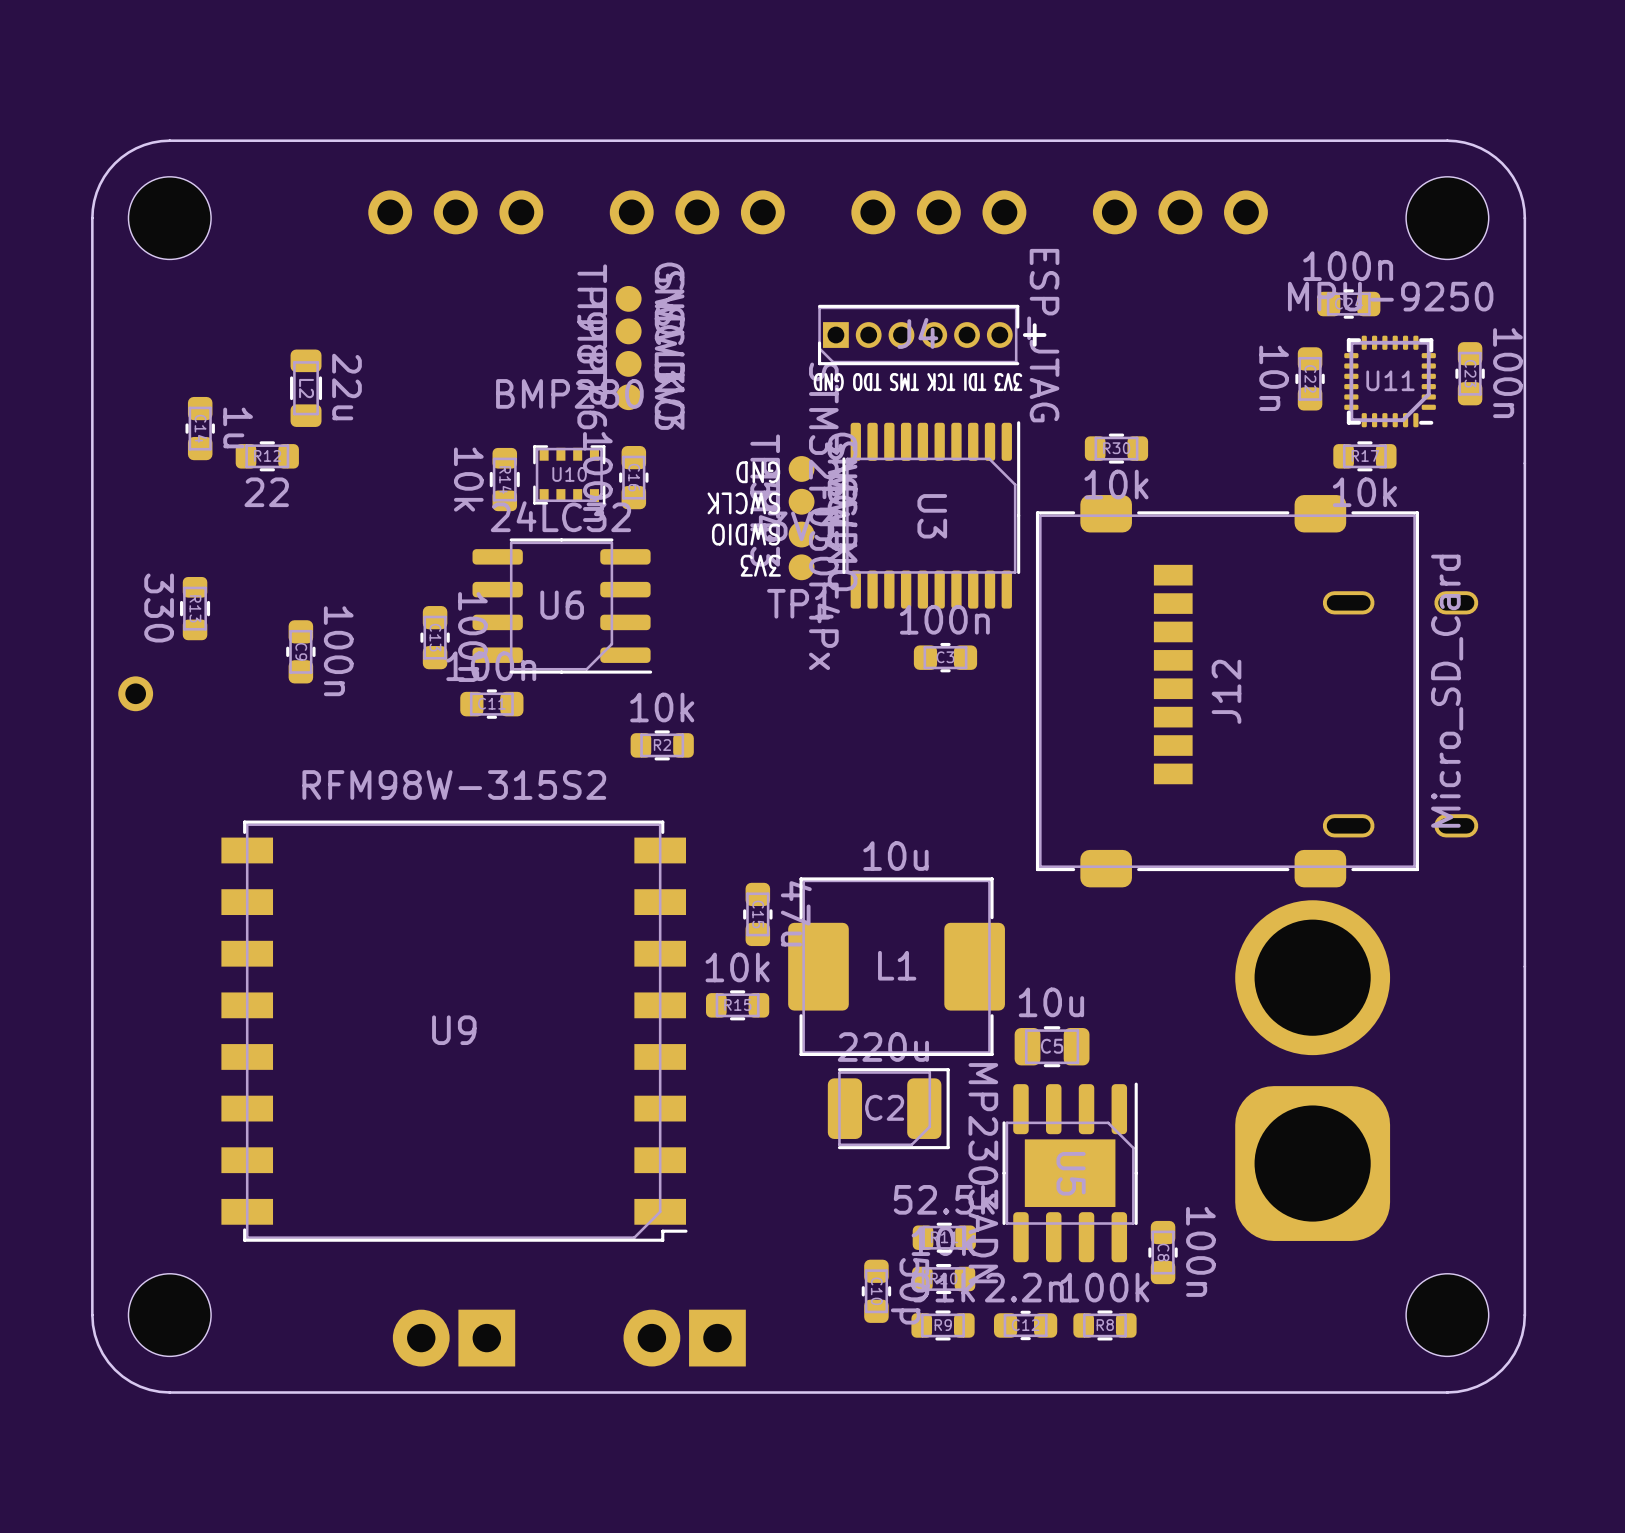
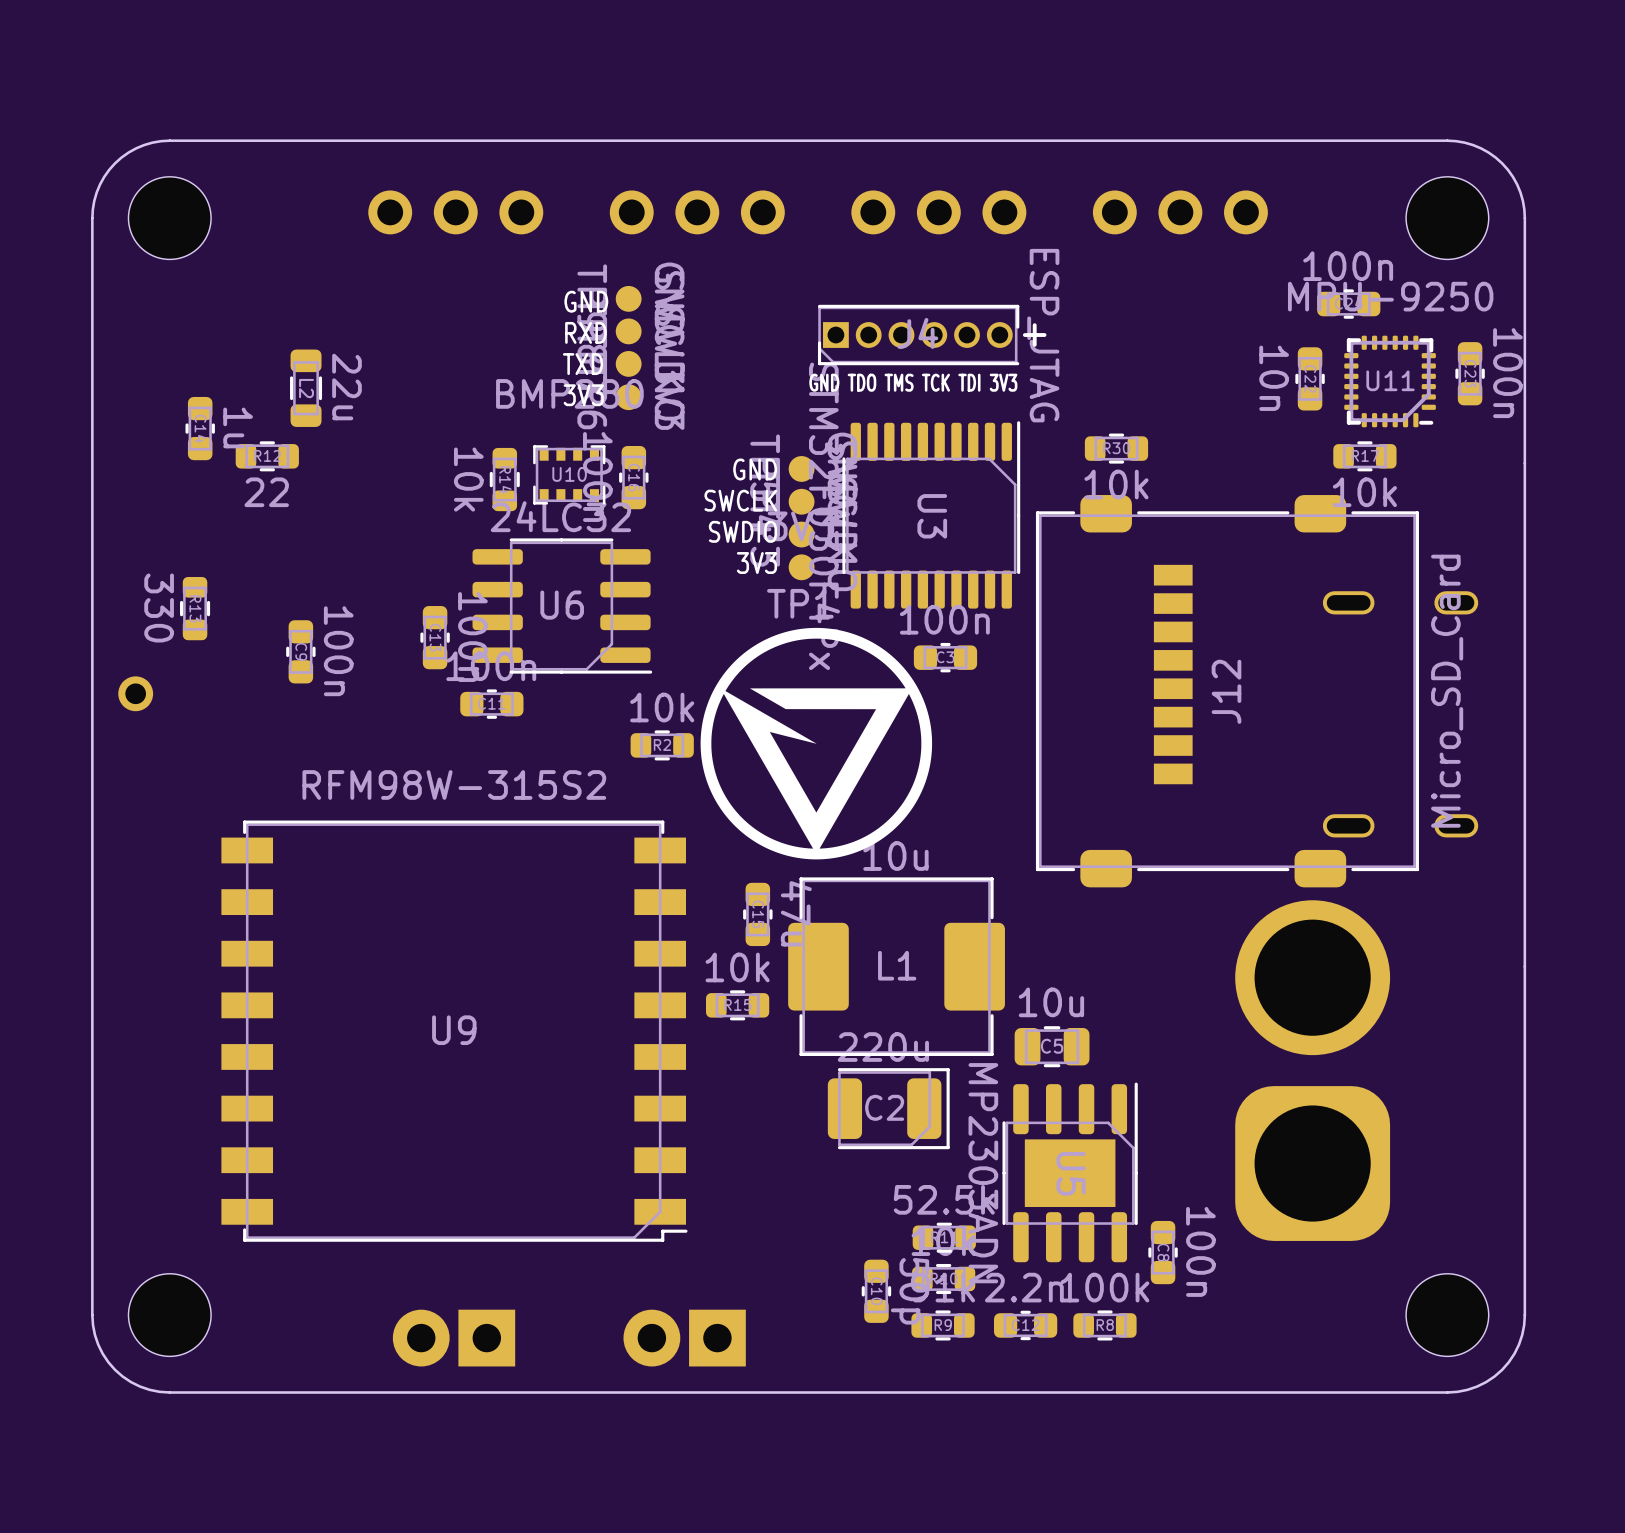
text: none -> GND (586, 301)
text: none -> RXD (585, 332)
text: none -> TXD (583, 364)
text: 3V3 TDI TCK TMS TDO GND (917, 382) -> GND TDO TMS TCK TDI 3V3 (913, 382)
text: none -> 3V3 (583, 395)
text rotation: 0° (758, 472) -> 180° (755, 469)
text rotation: 0° (743, 503) -> 180° (740, 500)
text rotation: 0° (746, 534) -> 180° (742, 531)
text rotation: 0° (760, 565) -> 180° (756, 563)
drawing: none -> [700, 627, 933, 860]

